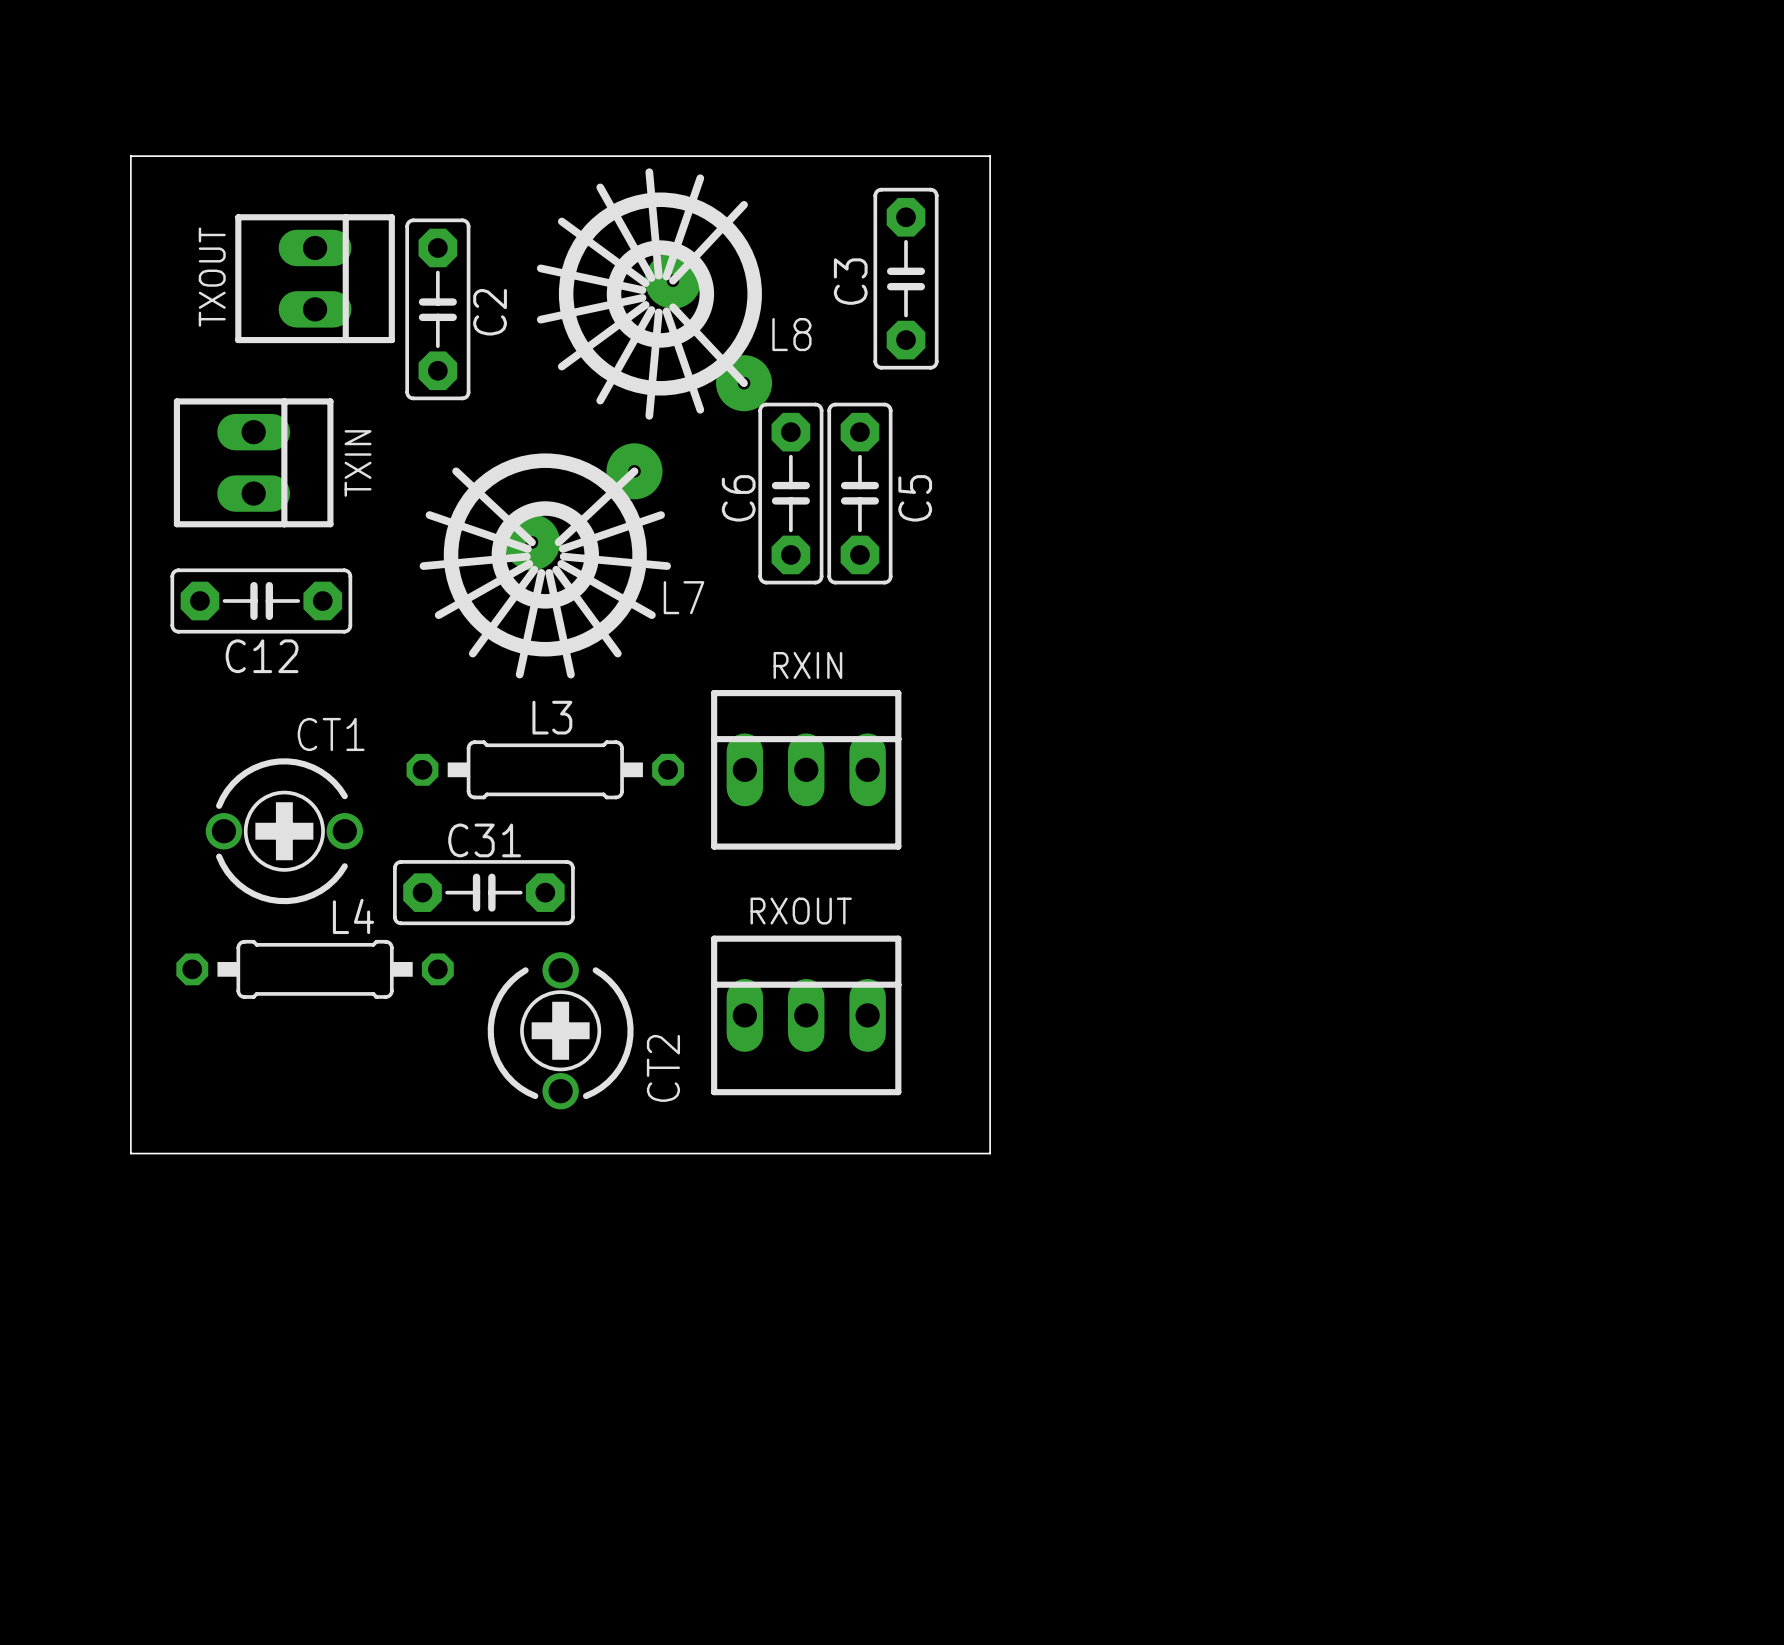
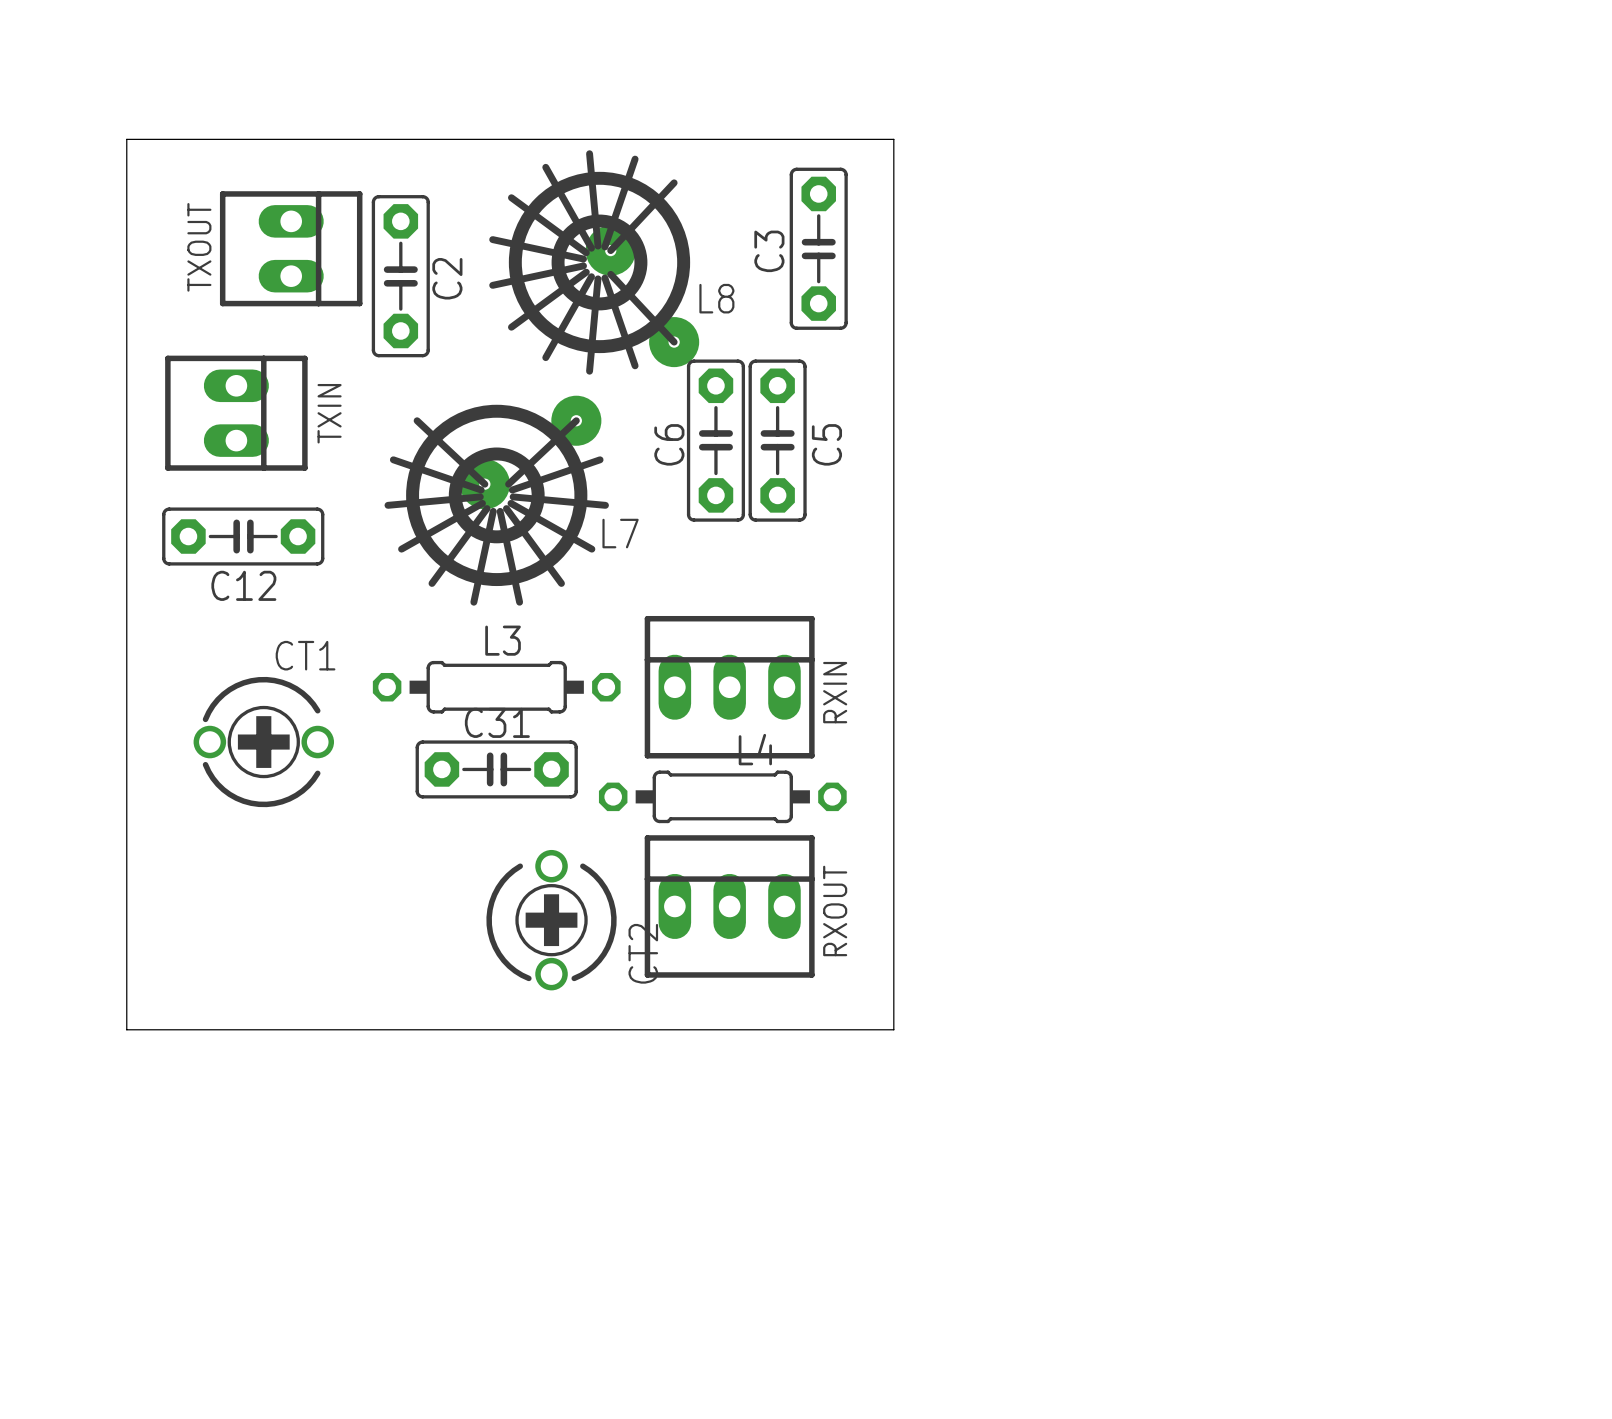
RXIN name rotation: 0° (807, 665) -> 90° counterclockwise (835, 692)
RXIN name position: RXIN (807, 665) -> RXIN (835, 692)
C31 position: (483, 892) -> (496, 769)
RXOUT name rotation: 0° (801, 911) -> 90° counterclockwise (835, 910)
RXOUT name position: RXOUT (801, 911) -> RXOUT (835, 910)
L4 position: (315, 969) -> (722, 796)
CT2 position: (560, 1030) -> (551, 920)

